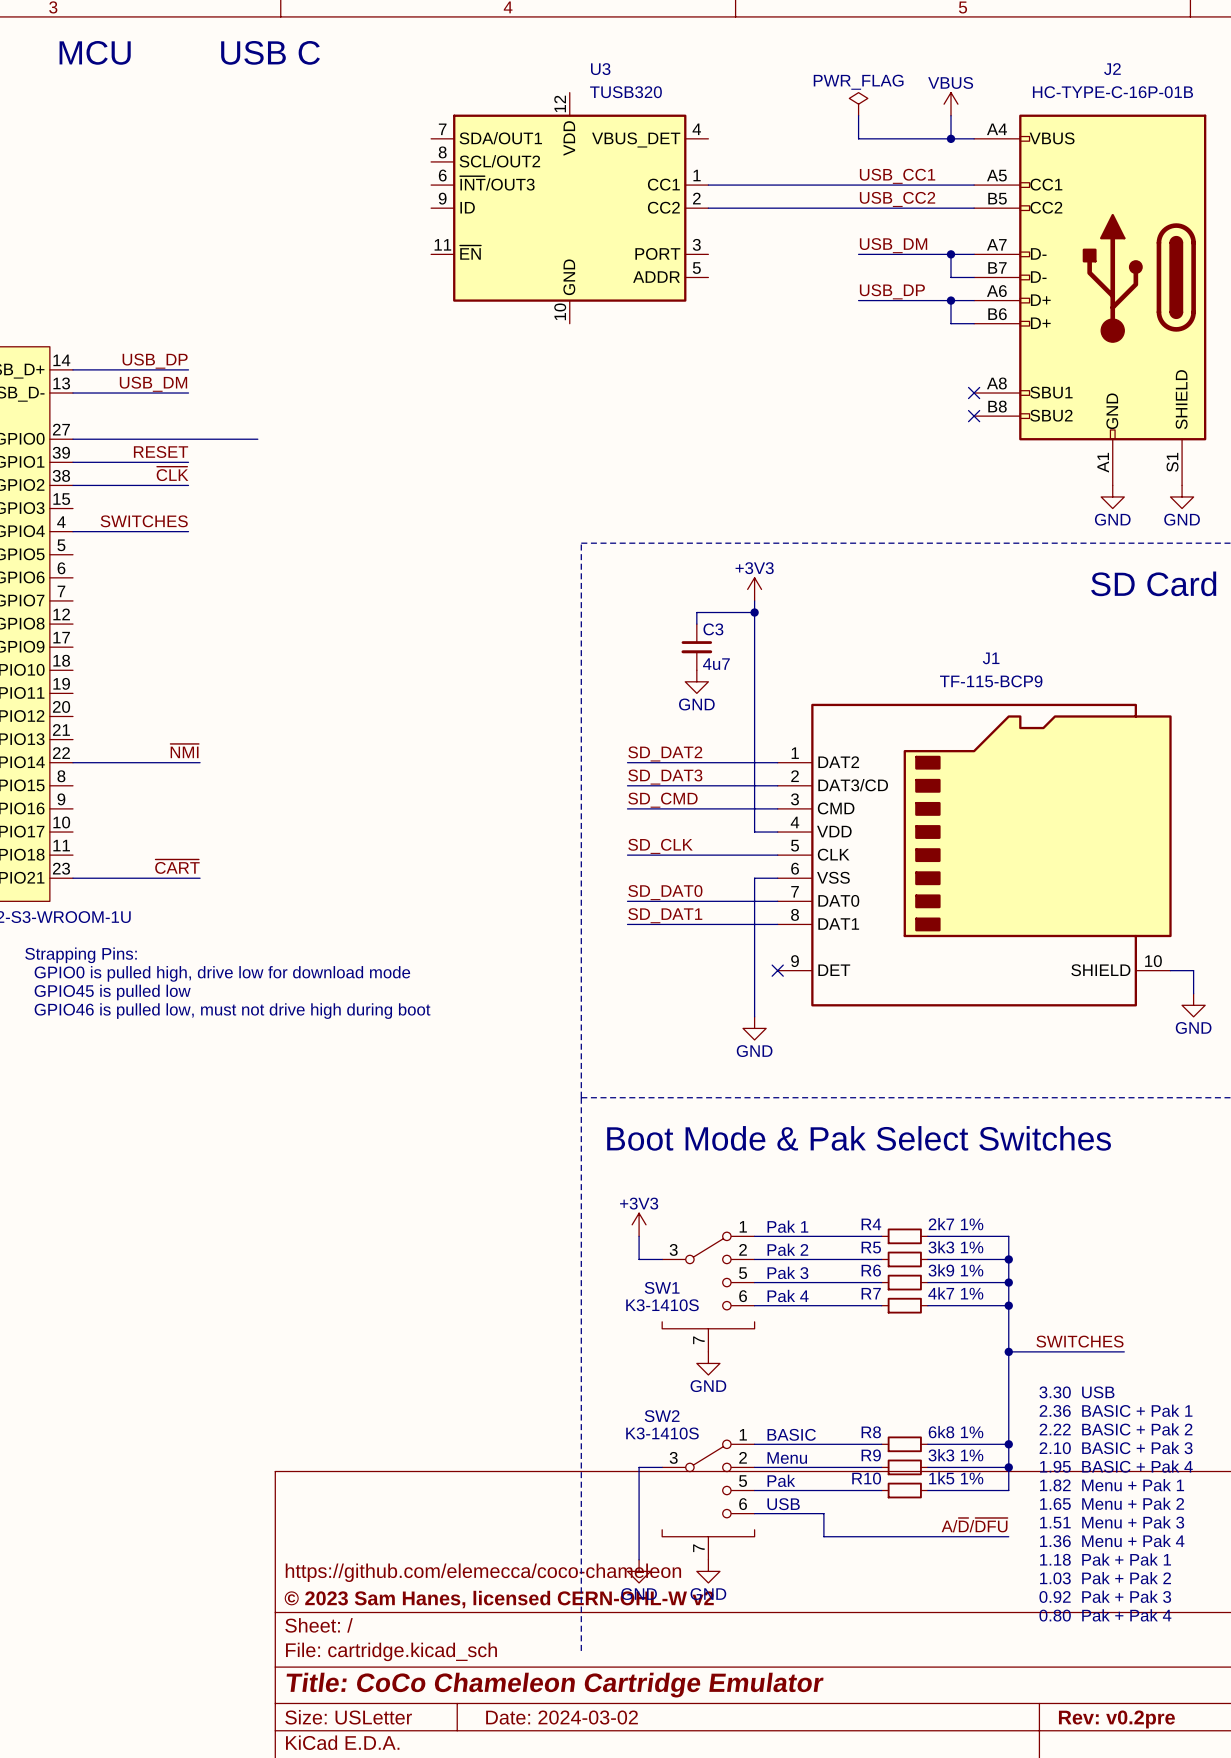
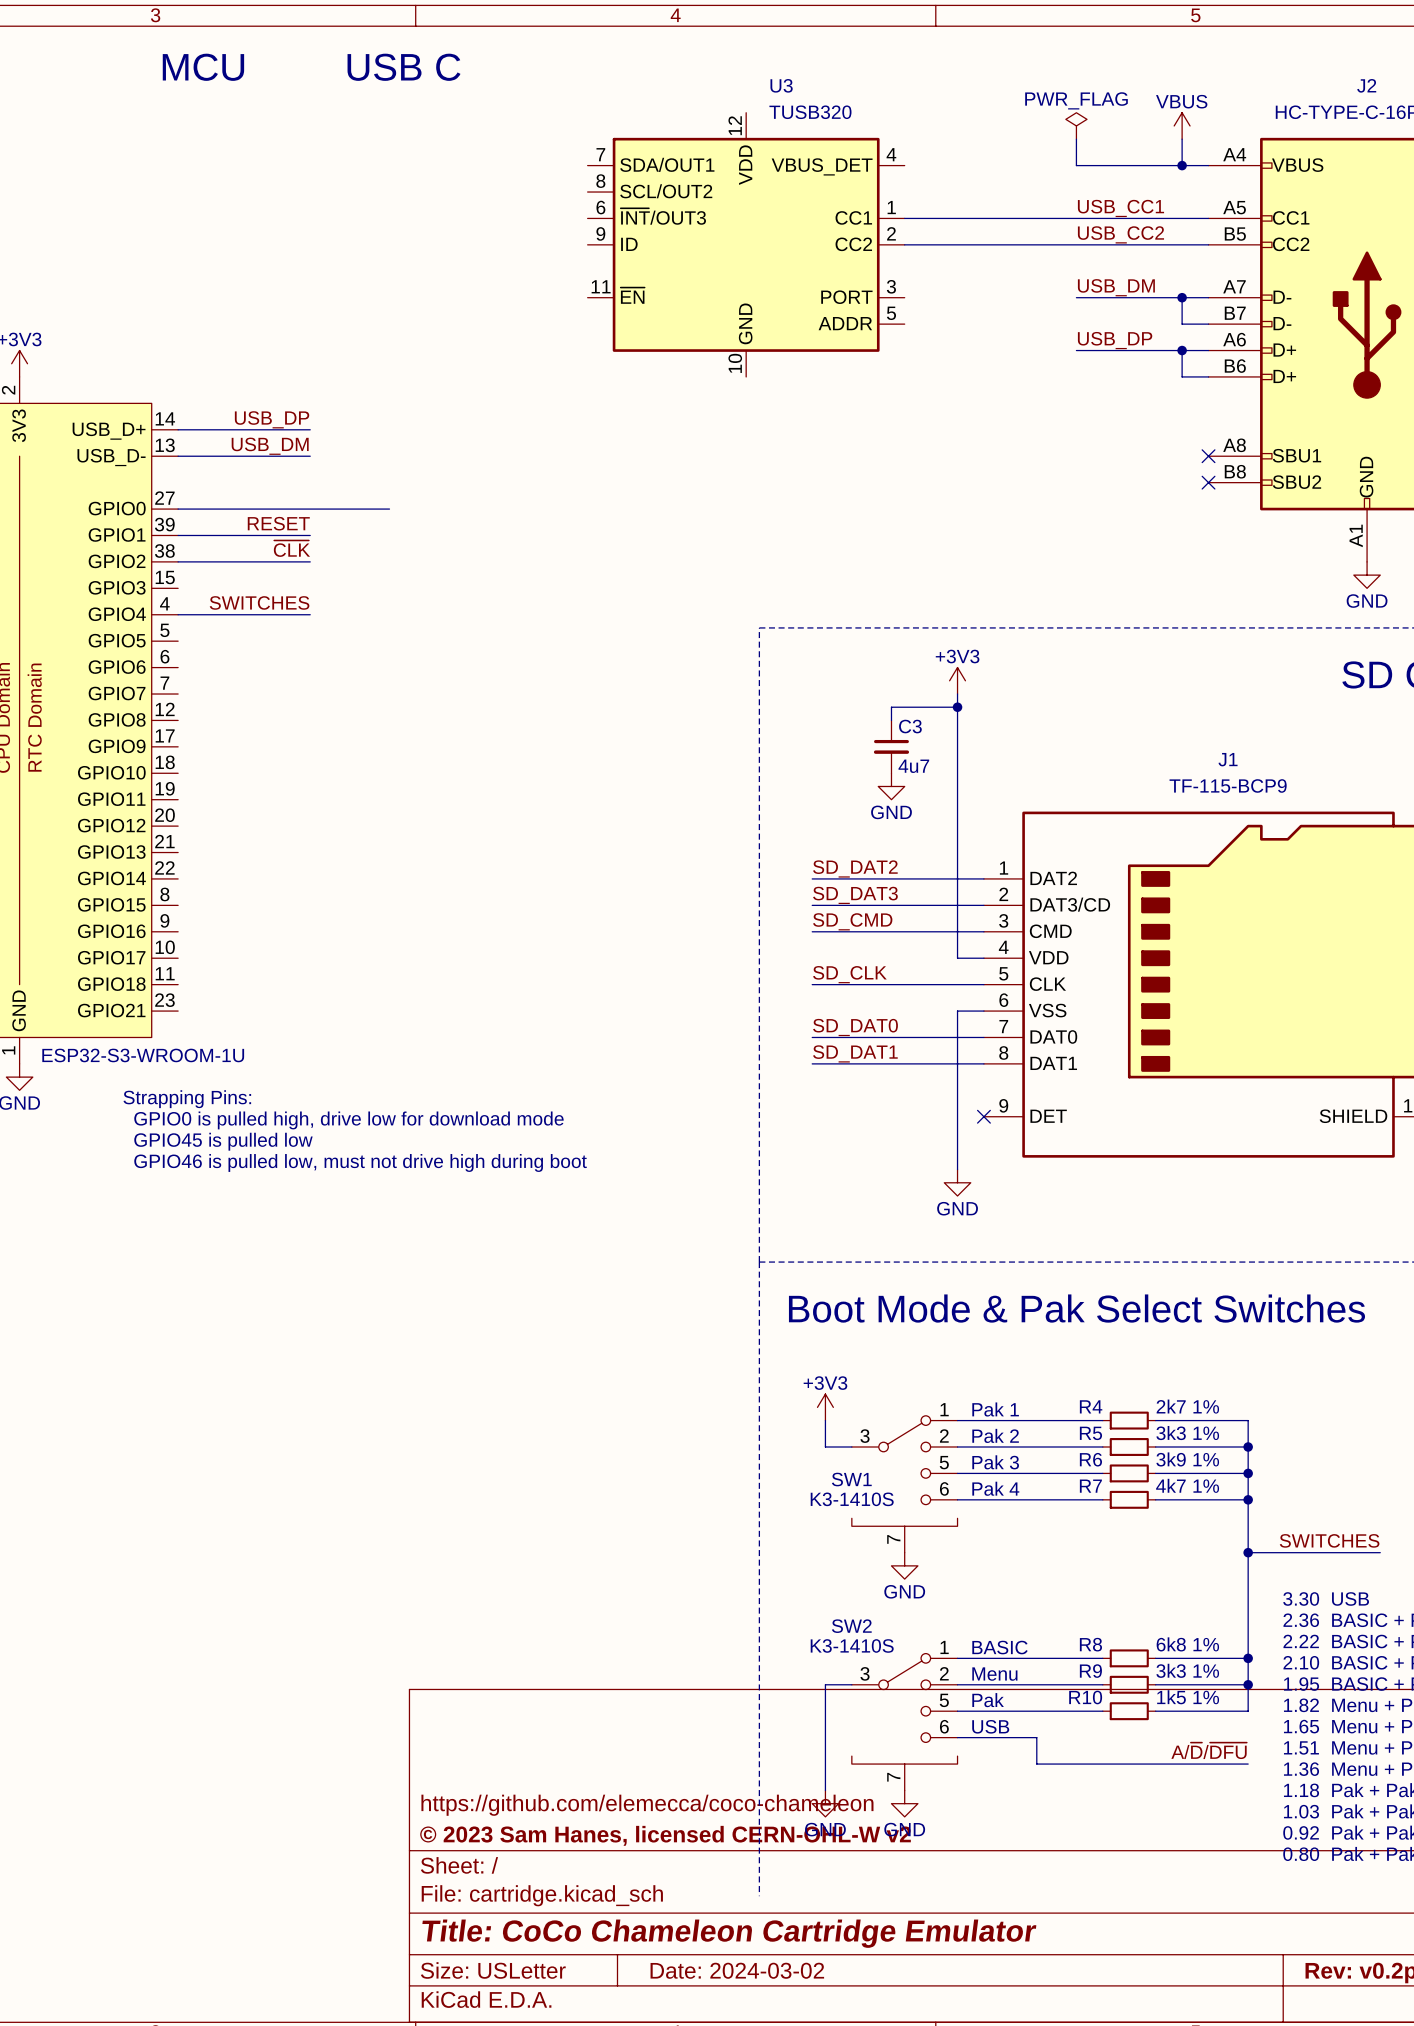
label: ~{NMI} (184, 751) -> none
wire: (72, 762) (200, 762) -> none
label: ~{CART} (177, 866) -> none
wire: (72, 878) (200, 878) -> none

